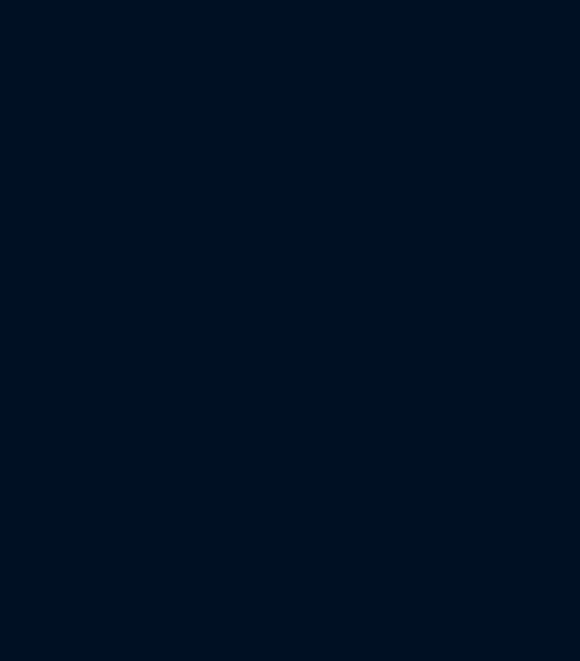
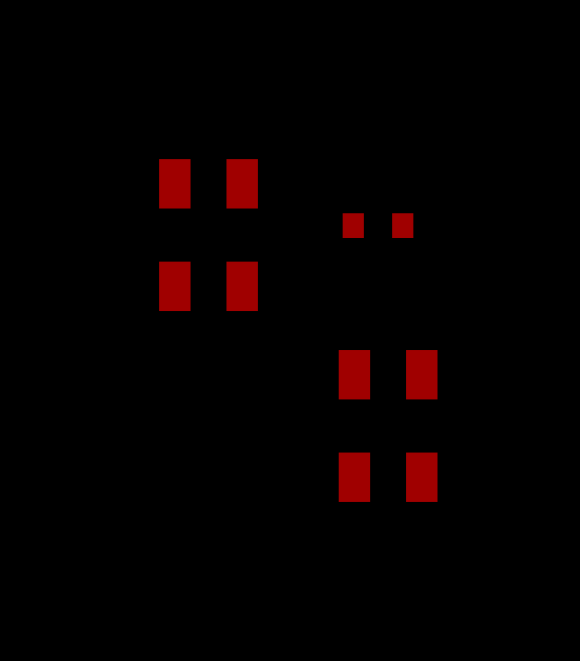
part: none -> (208, 183)
part: none -> (378, 225)
part: none -> (208, 286)
part: none -> (388, 374)
part: none -> (388, 477)

